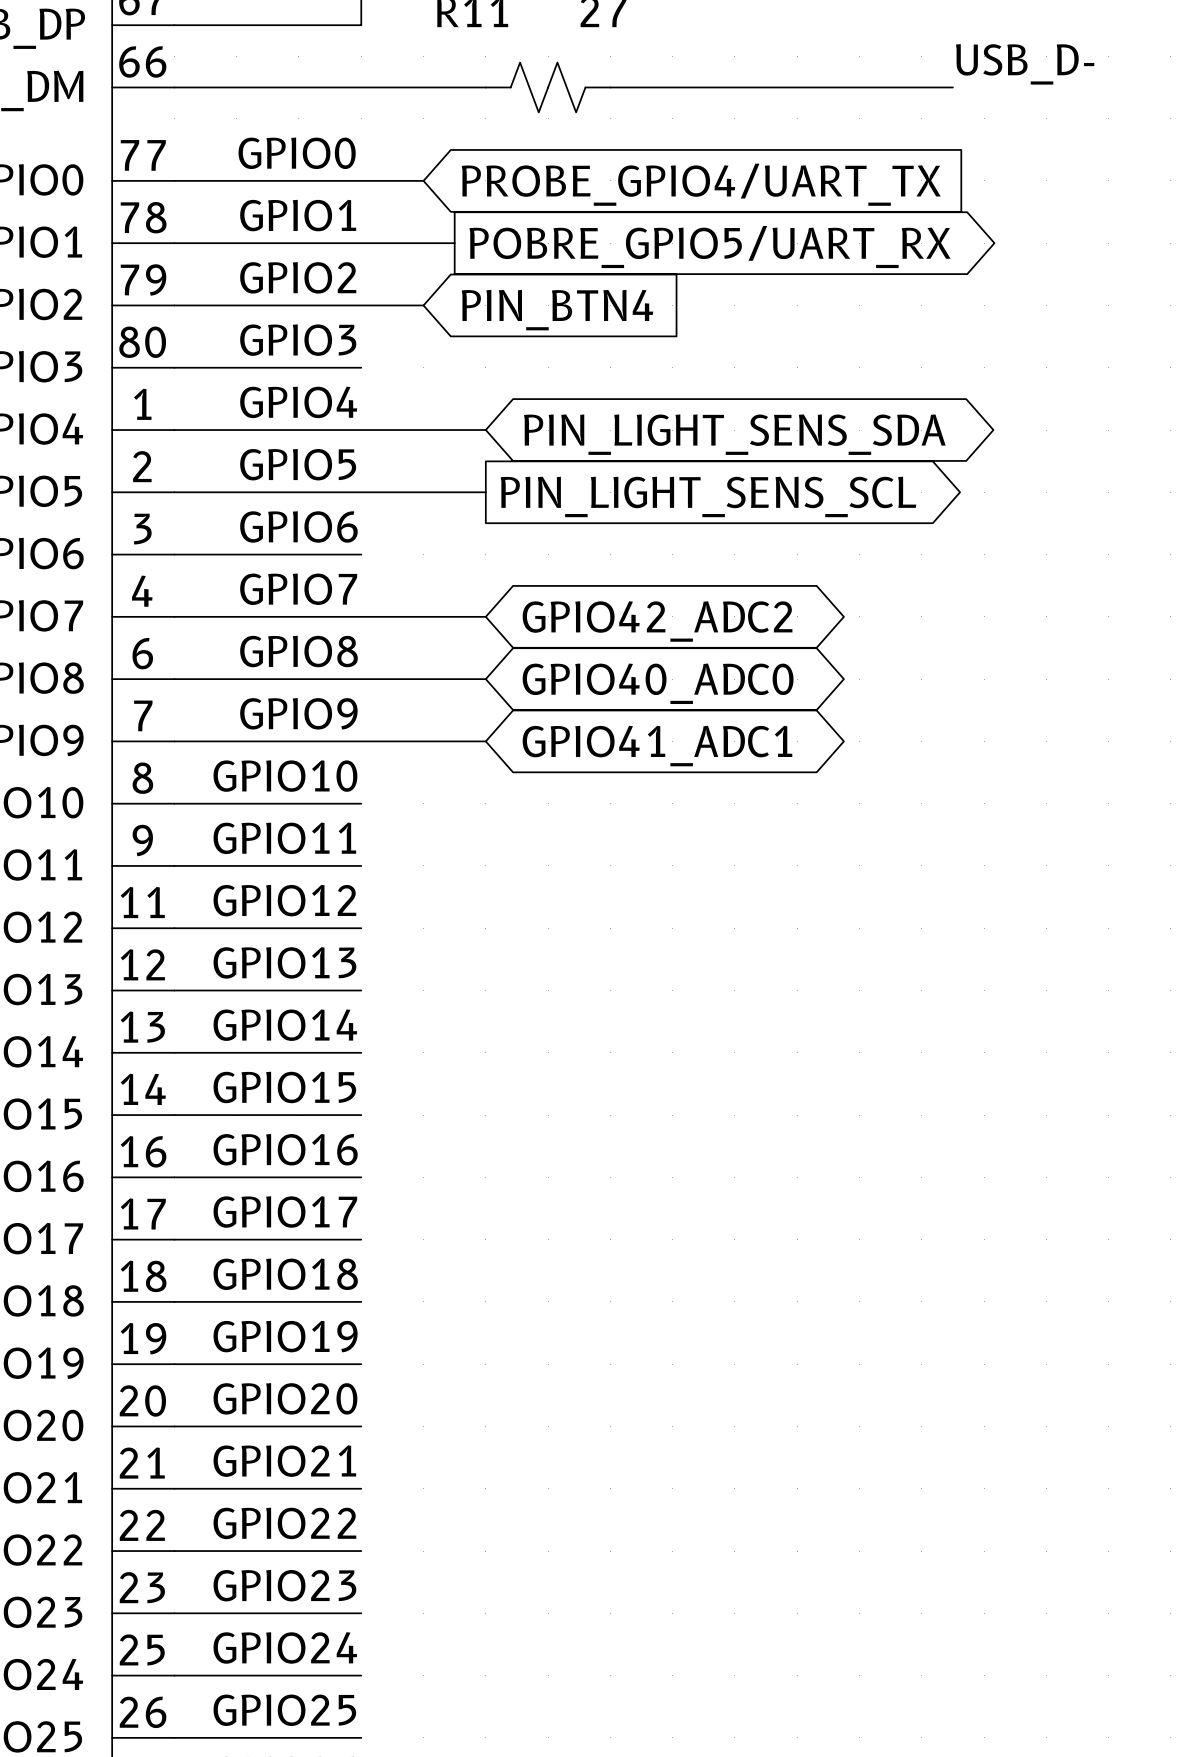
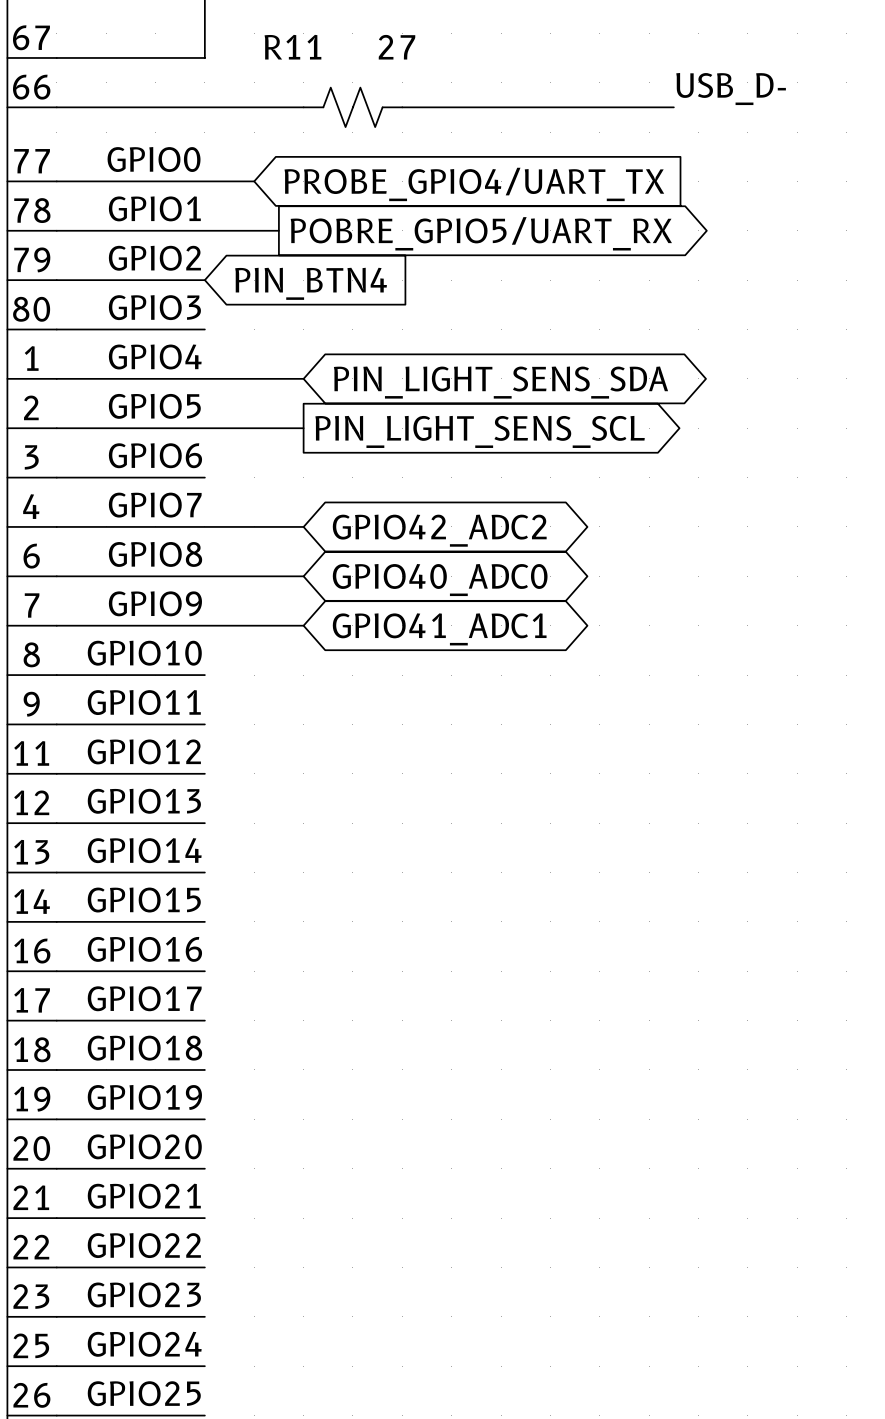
wire: (361, 305) (423, 305) -> none
global label position: PIN_BTN4 (557, 310) -> PIN_BTN4 (311, 283)

